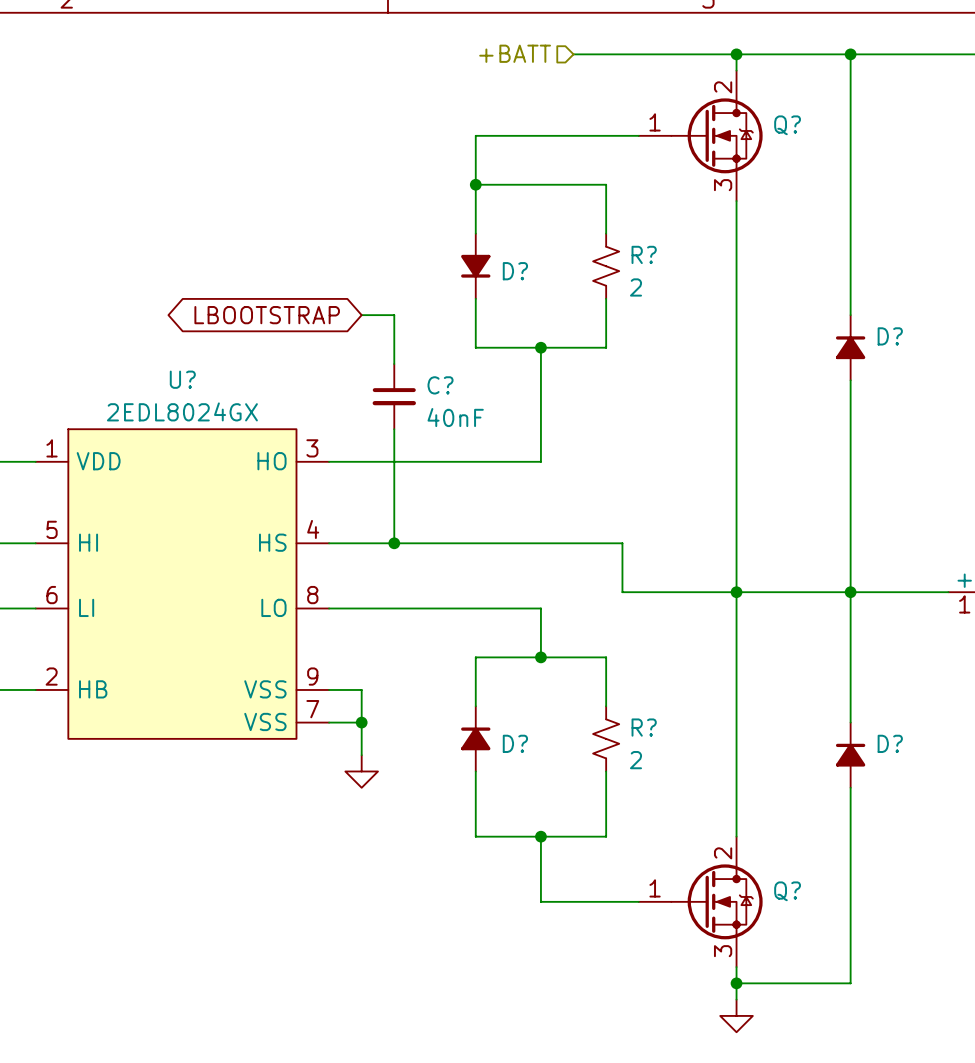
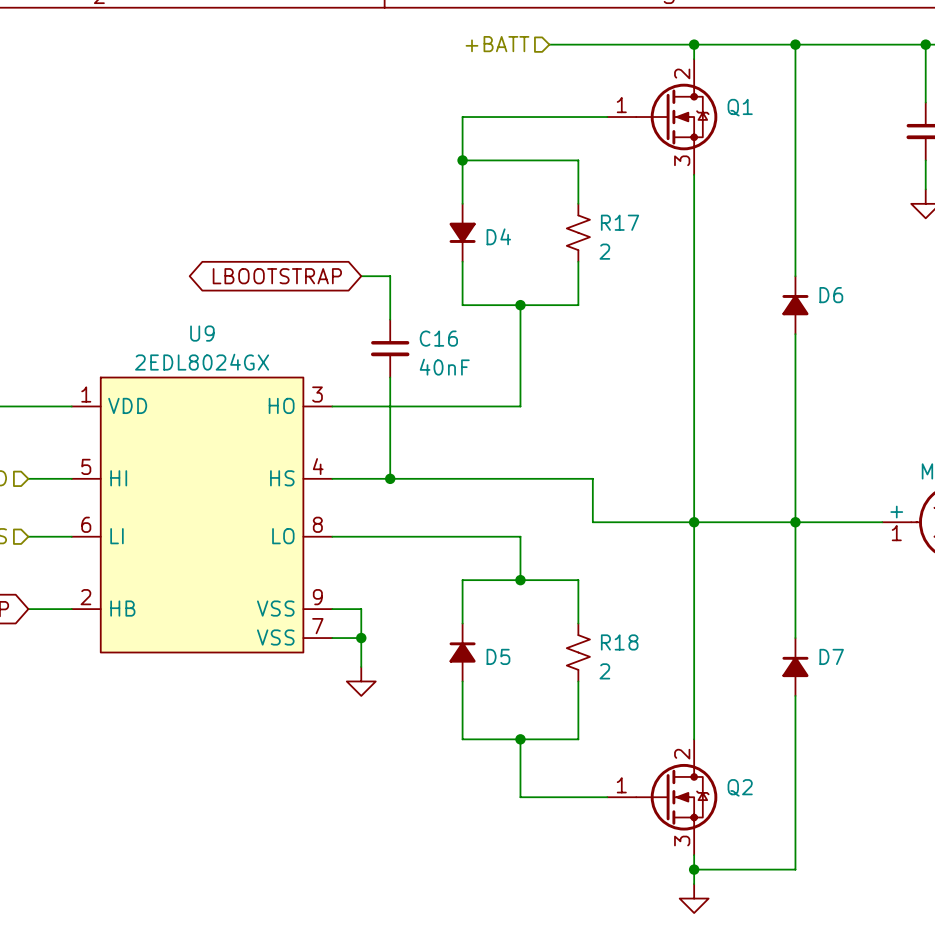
Q? name: Q? (787, 125) -> Q1 (740, 107)
R? name: R? (644, 254) -> R17 (620, 222)
D? name: D? (515, 271) -> D4 (498, 236)
D? name: D? (890, 336) -> D6 (831, 295)
U? name: U? (182, 379) -> U9 (202, 333)
C? name: C? (440, 385) -> C16 (438, 338)
R? name: R? (644, 727) -> R18 (619, 642)
D? name: D? (515, 743) -> D5 (498, 656)
D? name: D? (890, 743) -> D7 (831, 656)
Q? name: Q? (787, 891) -> Q2 (740, 787)

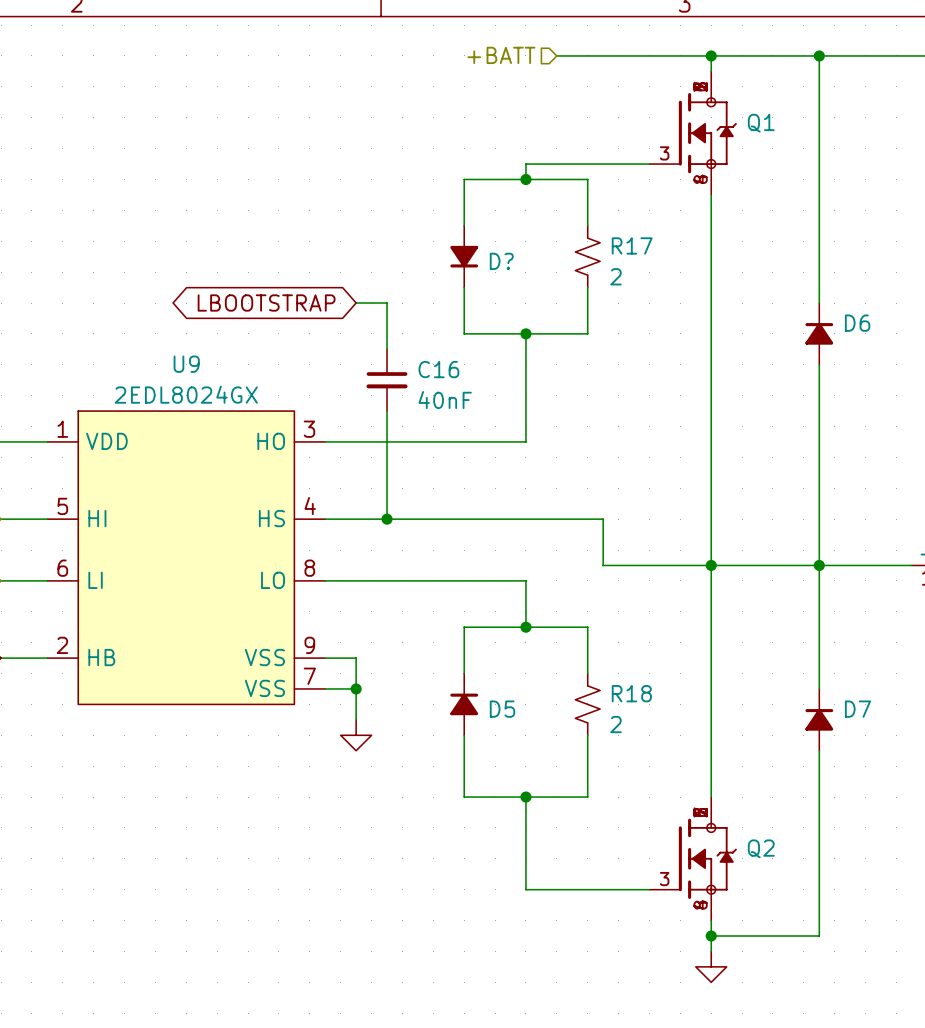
Q1 symbol: [607, 59, 718, 175] -> [649, 71, 737, 195]
wire: (607, 117) (462, 117) (462, 160) -> none
wire: none -> (649, 164) (525, 164) (525, 179)
junction position: (462, 160) -> (525, 179)
D4 name: D4 (498, 236) -> D? (501, 261)
Q2 symbol: [607, 739, 718, 856] -> [649, 797, 737, 921]
wire: (520, 797) (607, 797) -> (525, 858) (525, 889) (649, 889)

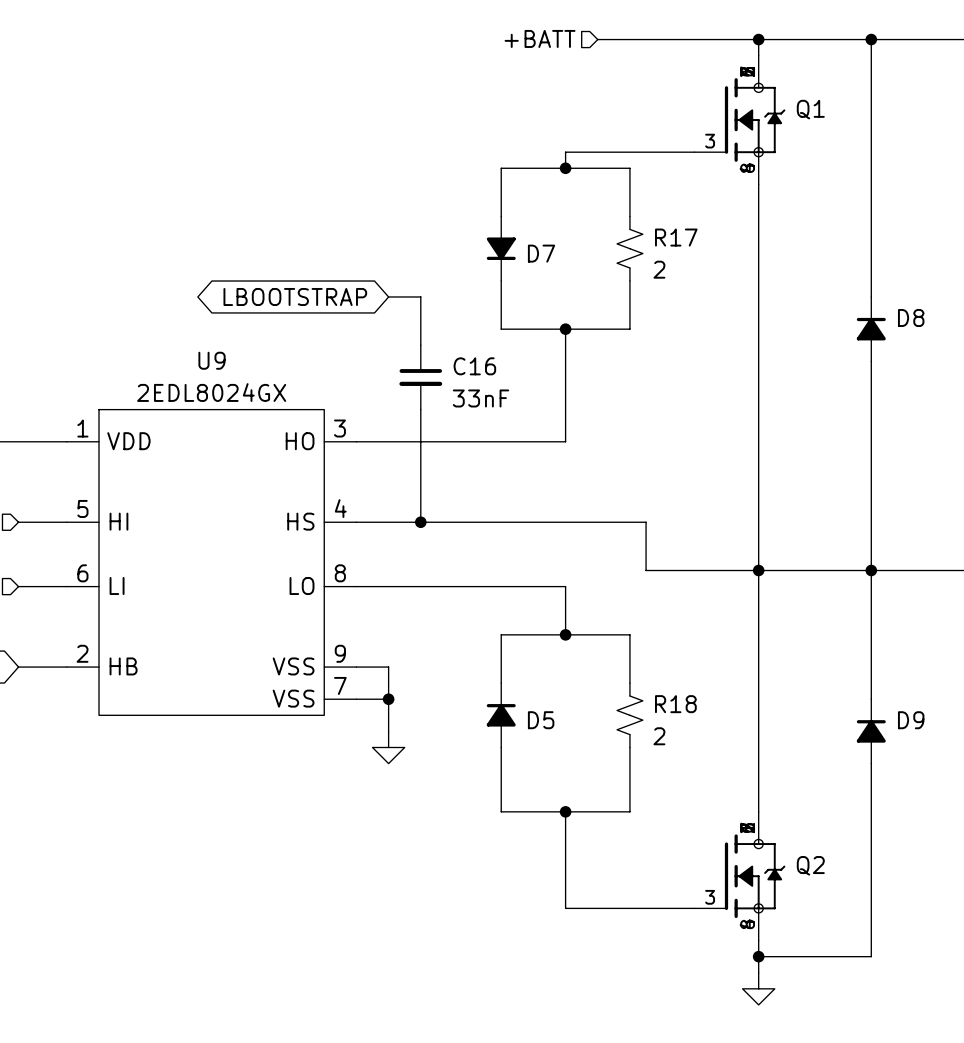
D? name: D? (501, 261) -> D7 (541, 253)
D6 name: D6 (857, 323) -> D8 (911, 317)
C16 value: 40nF (445, 400) -> 33nF (481, 398)
D7 name: D7 (857, 709) -> D9 (911, 720)

